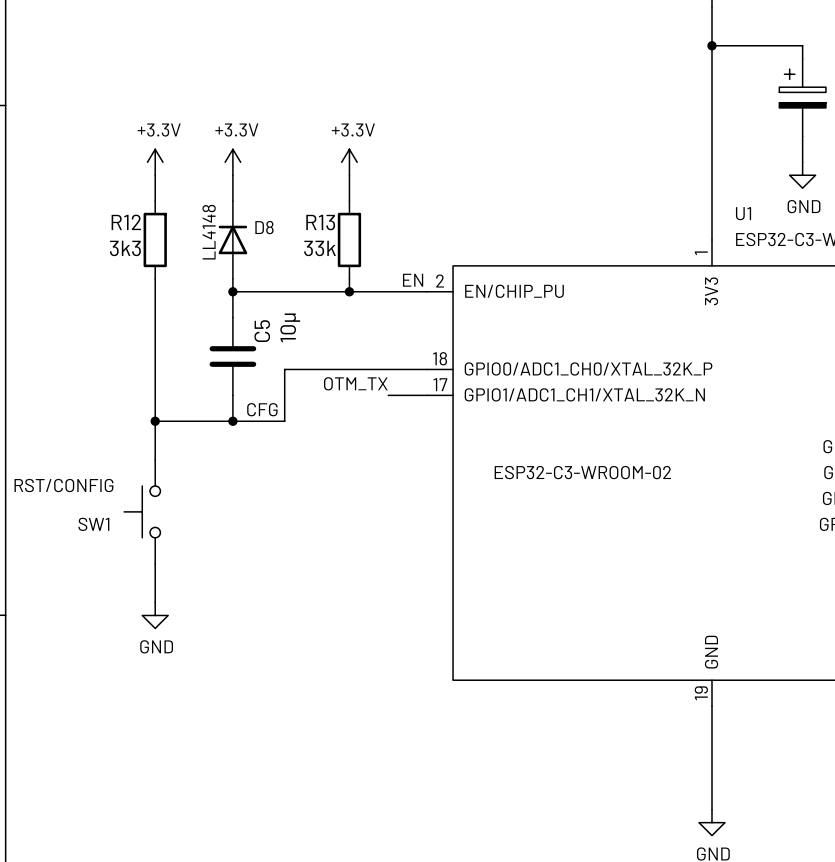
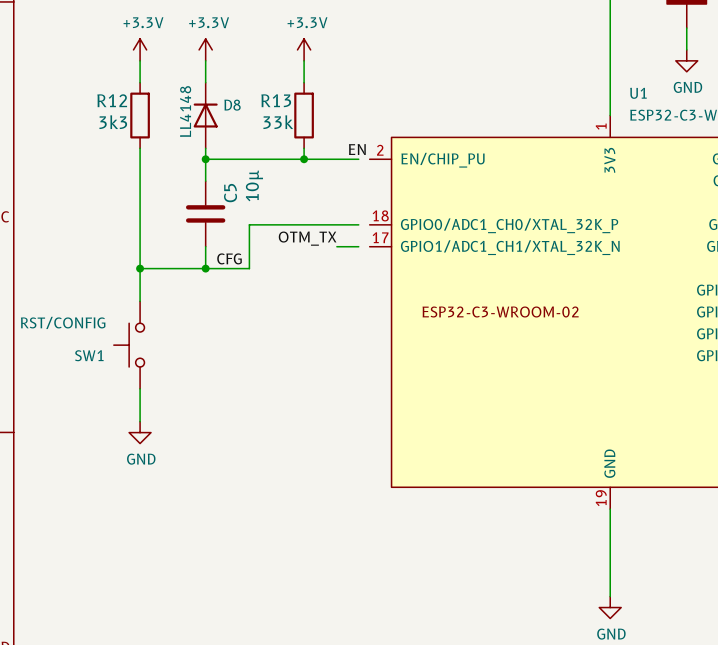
wire: (414, 291) (427, 291) -> none
wire: (414, 369) (427, 369) -> none
wire: (414, 395) (427, 395) -> none

